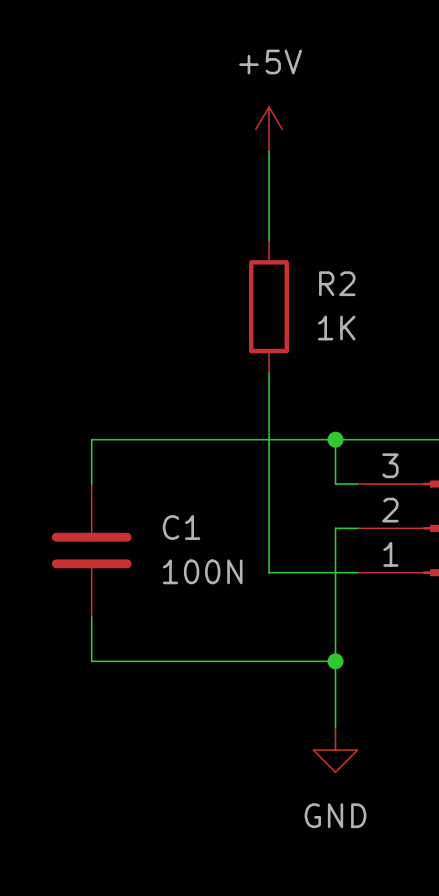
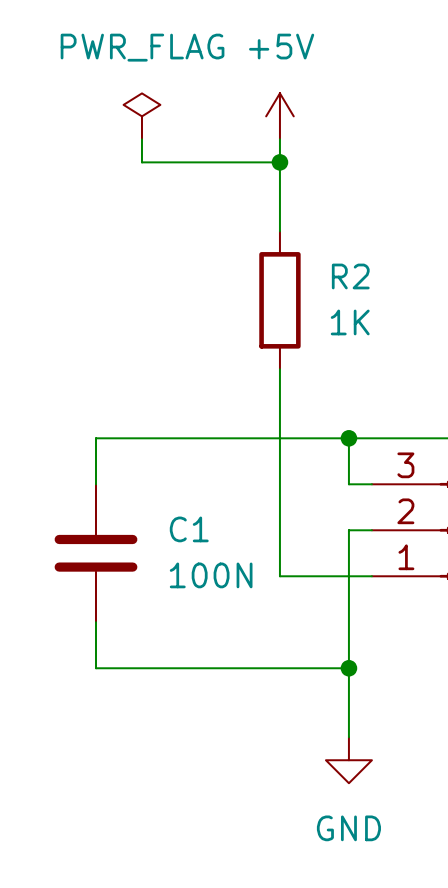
power symbol: none -> PWR_FLAG (141, 116)
wire: none -> (141, 139) (141, 162) (279, 162)
junction: none -> (279, 162)

